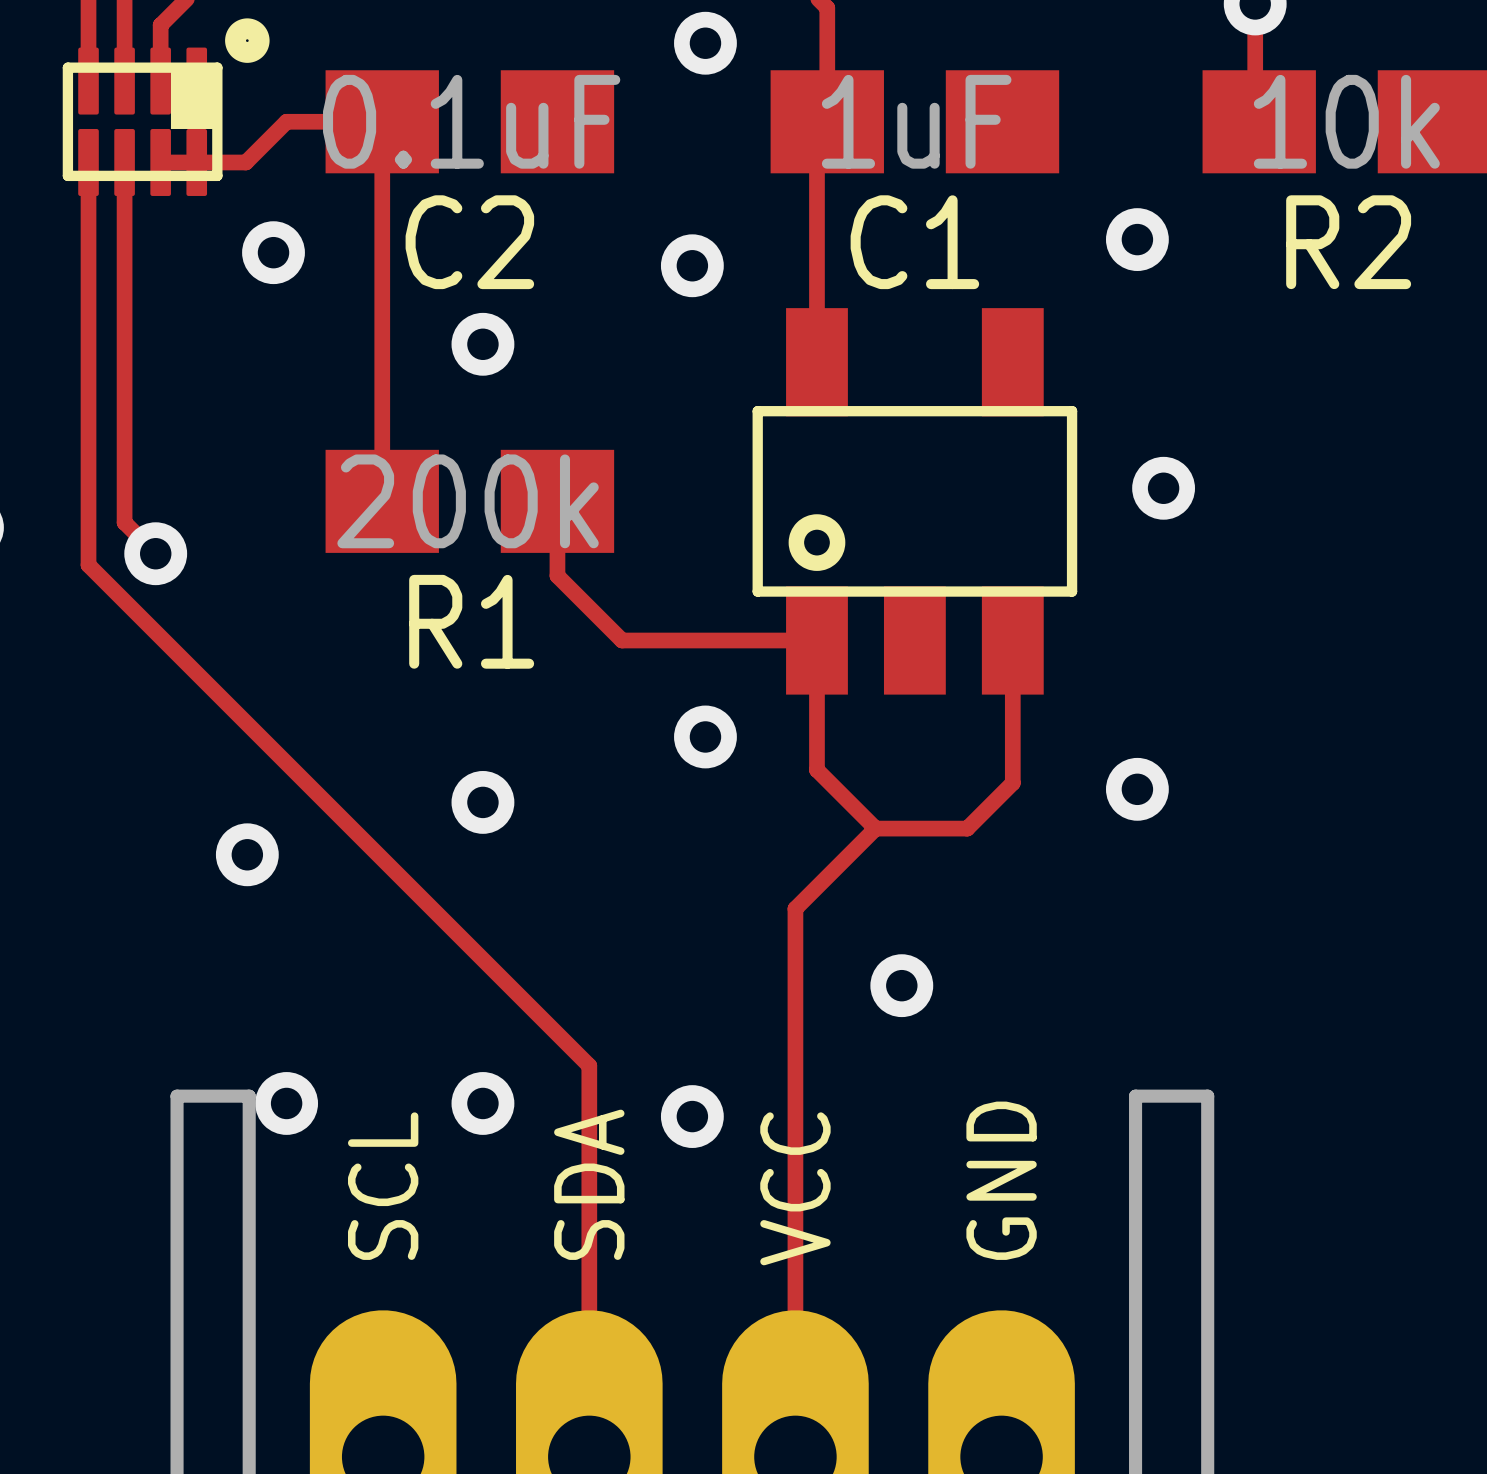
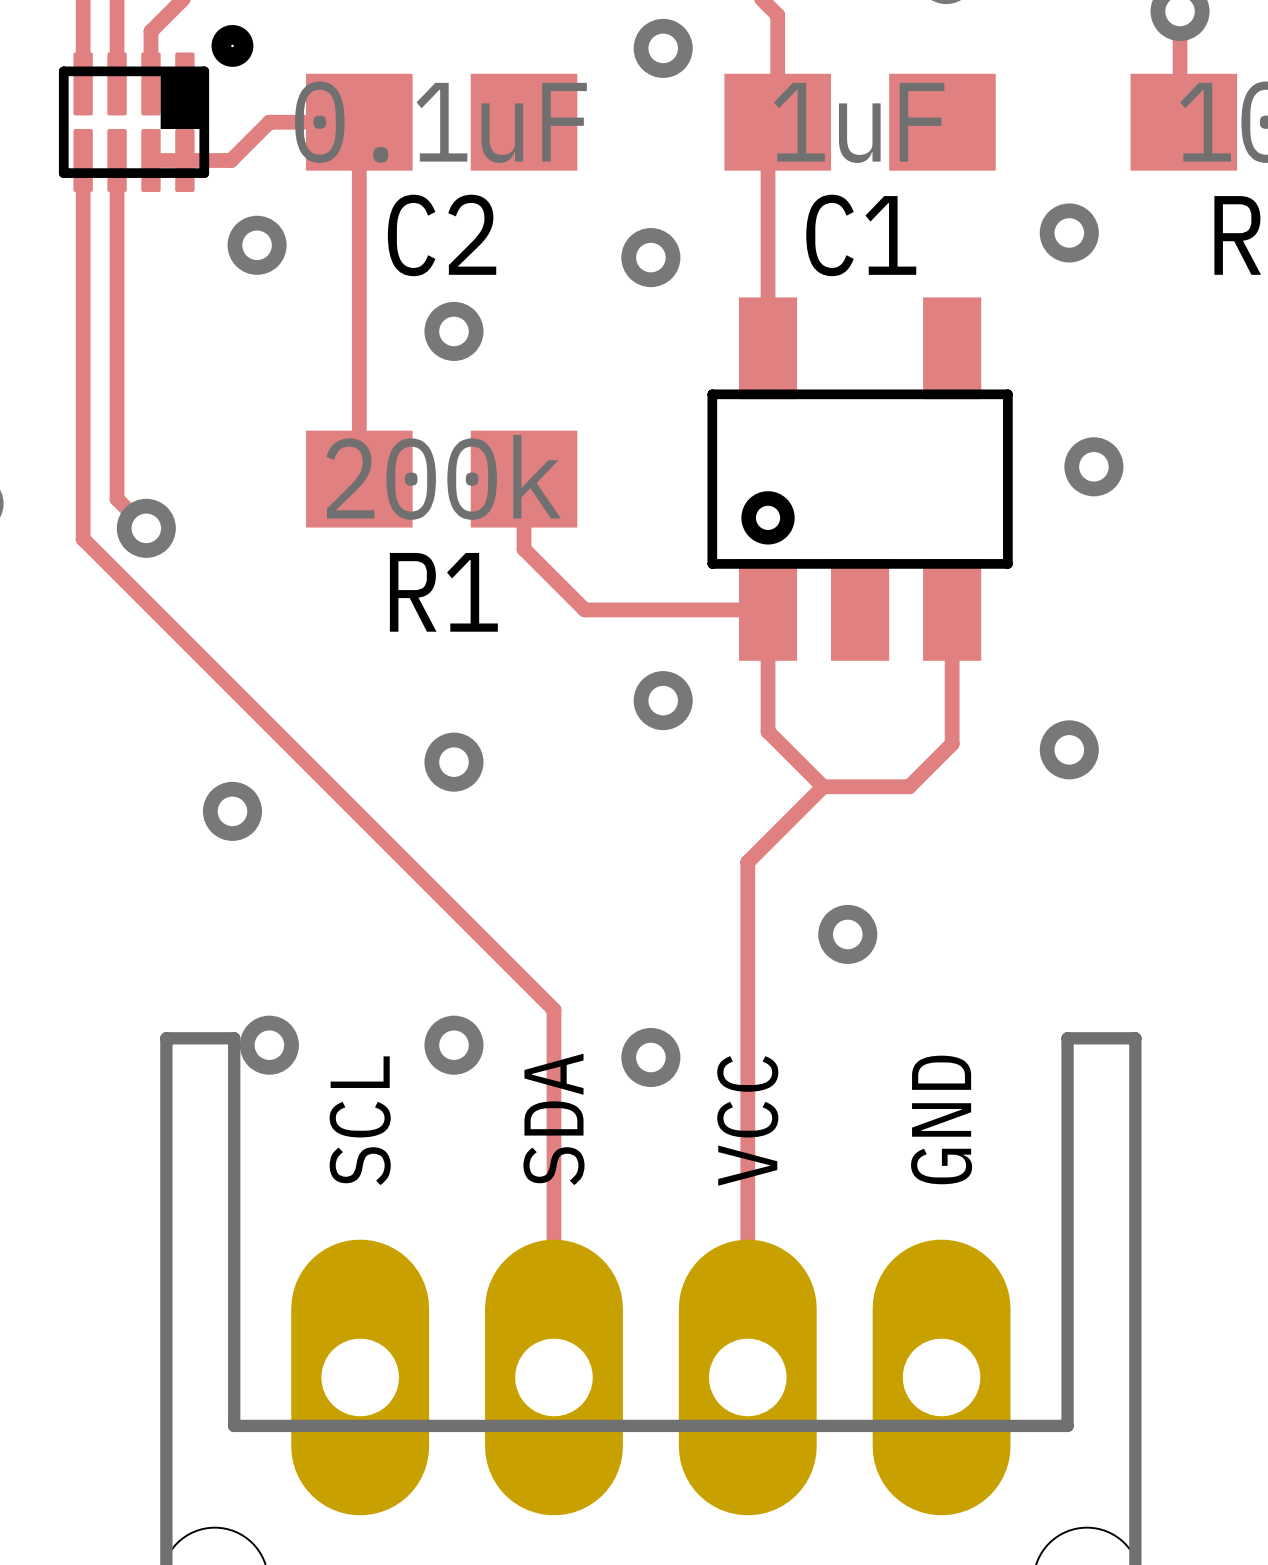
part text position: GND (1001, 1180) -> GND (941, 1119)
part text position: SDA (589, 1184) -> SDA (553, 1119)
part text position: SCL (383, 1186) -> SCL (360, 1120)
part text position: VCC (795, 1188) -> VCC (747, 1120)

